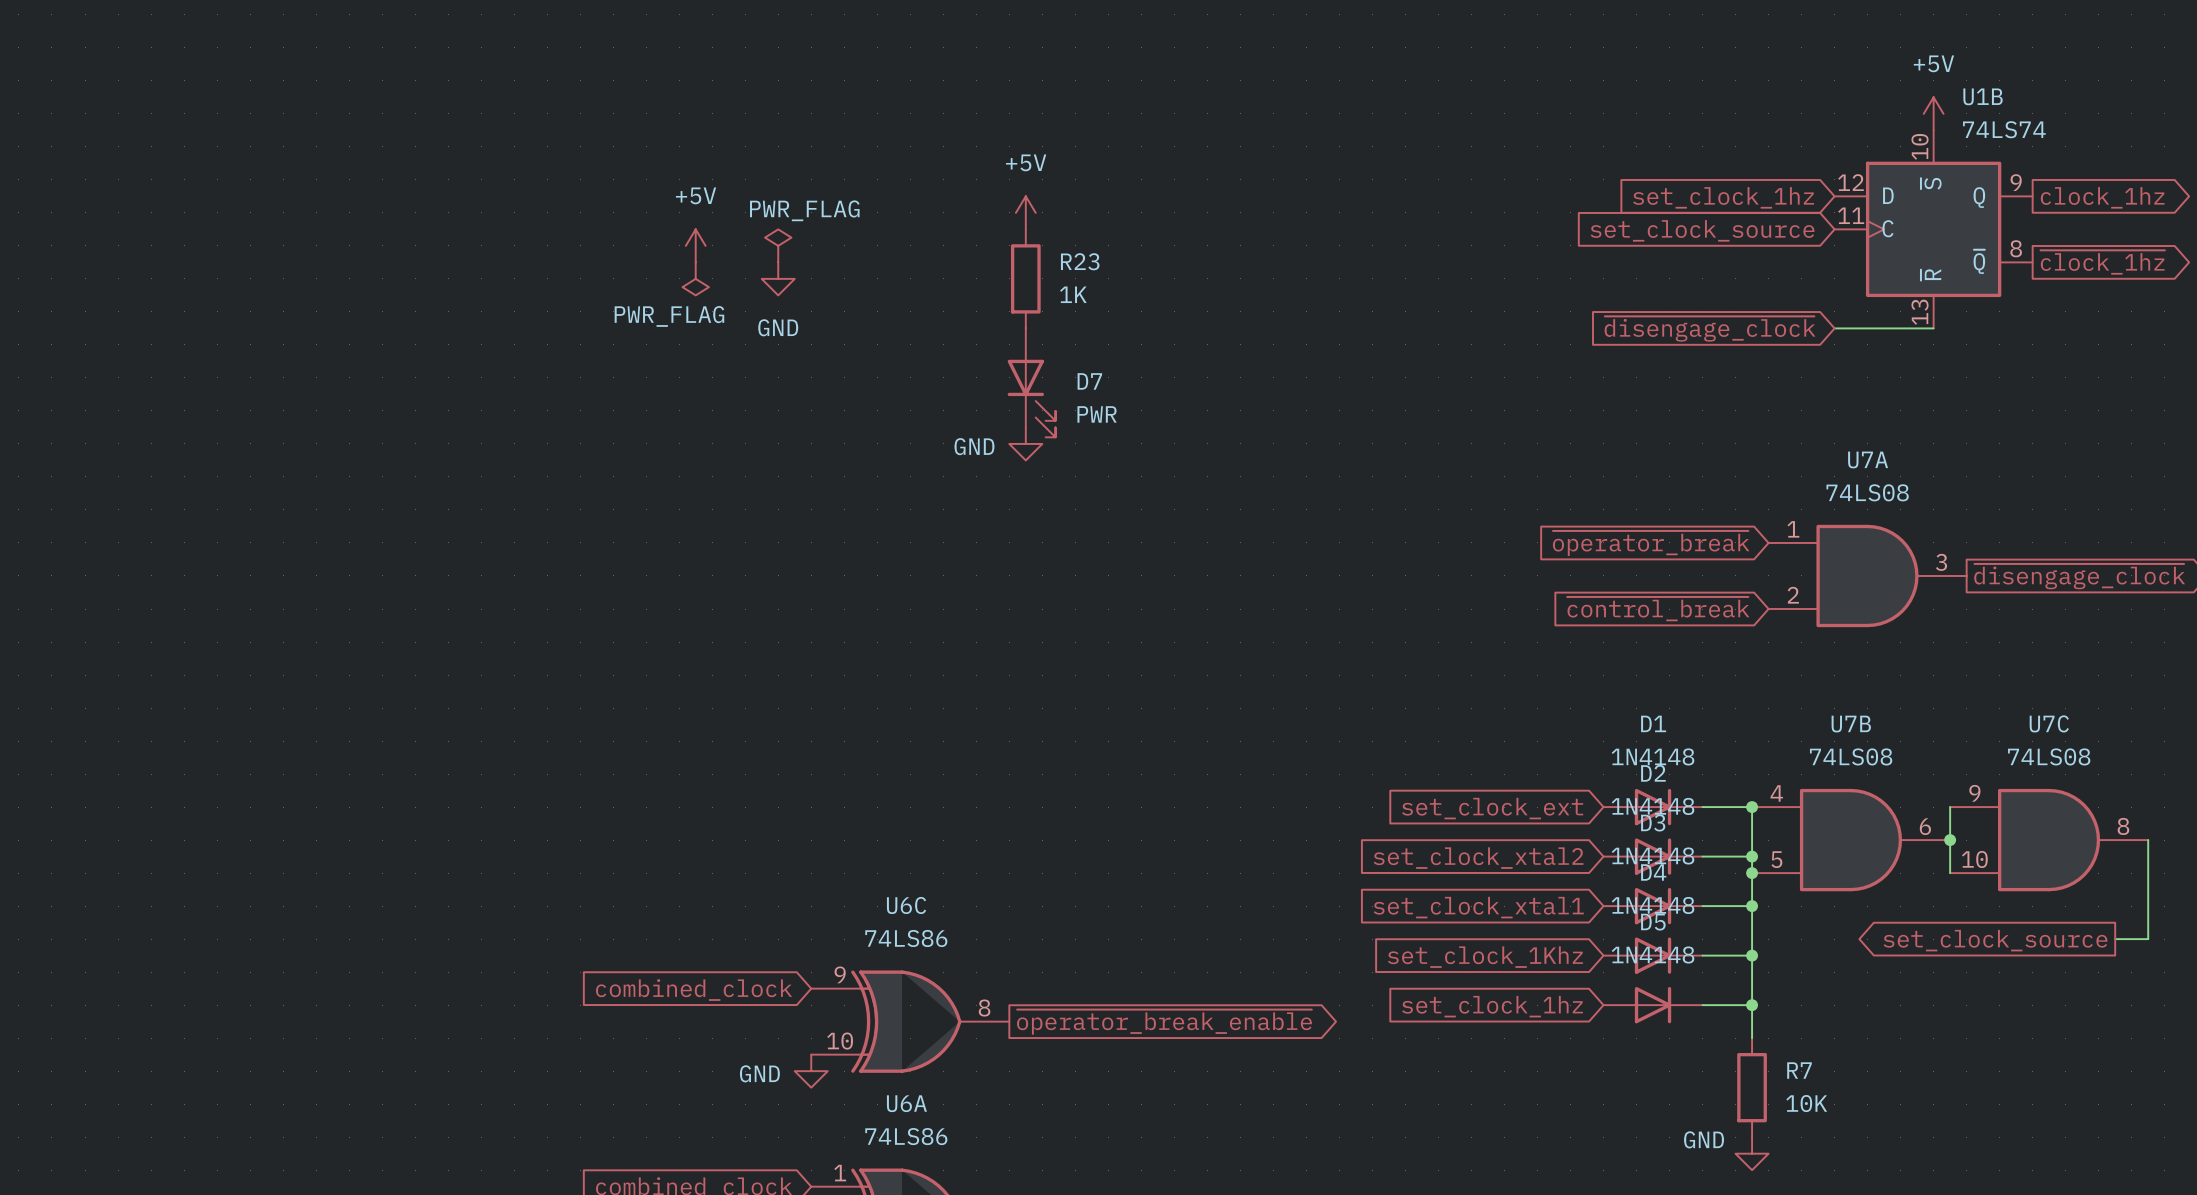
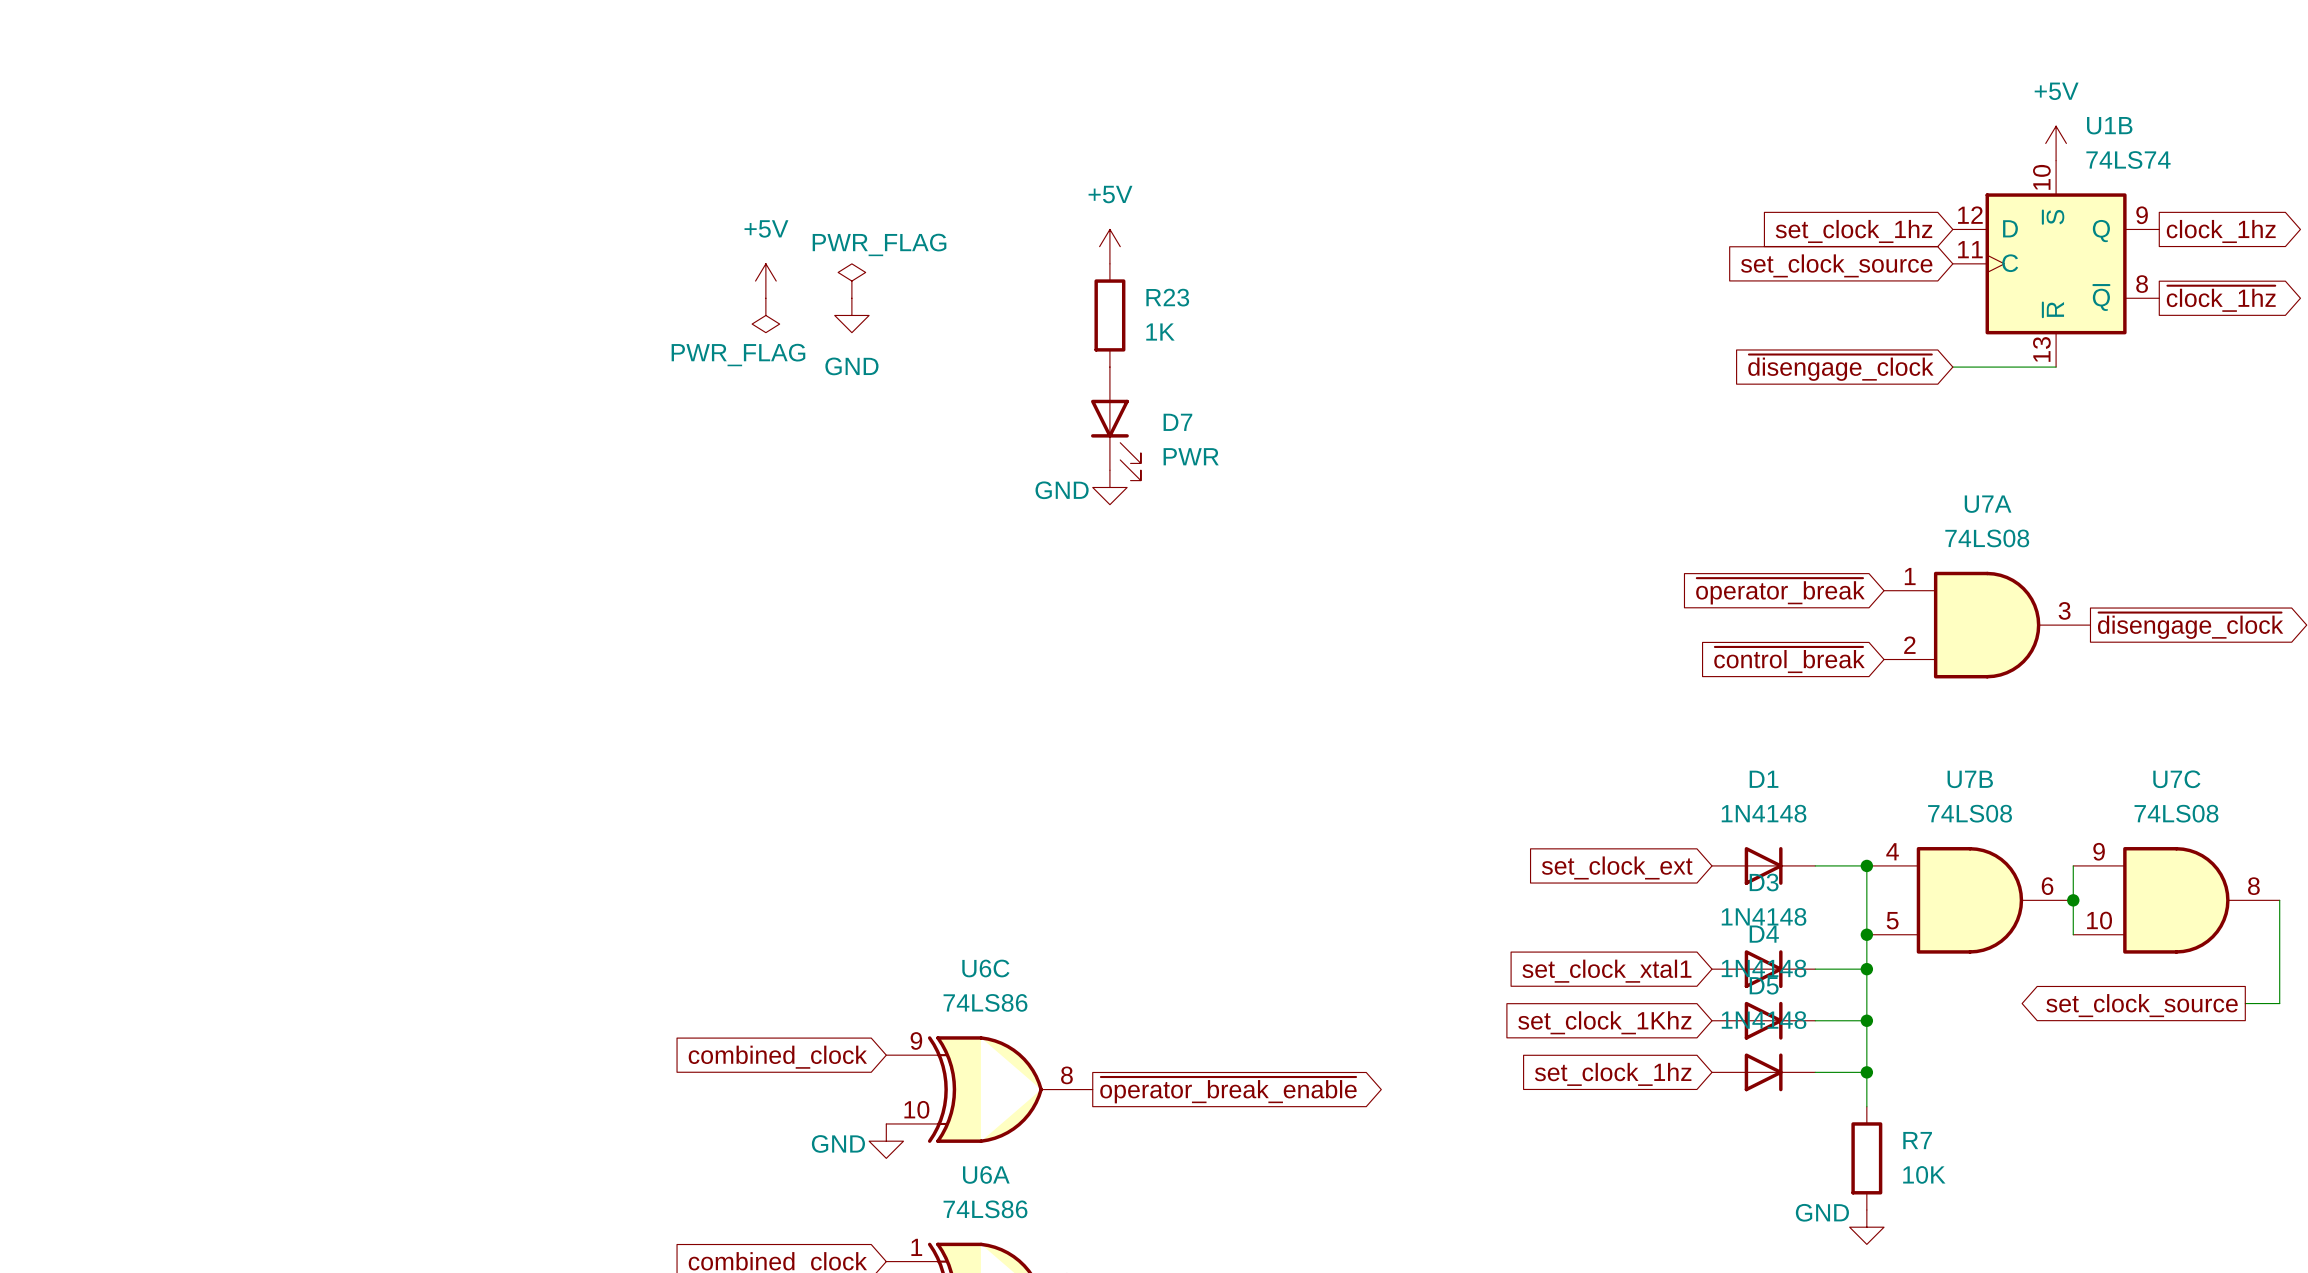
D2: 1N4148 (1653, 856) -> none
wire: (1702, 856) (1752, 856) -> none
junction: (1752, 856) -> none
global label: set_clock_xtal2 (1478, 858) -> none

